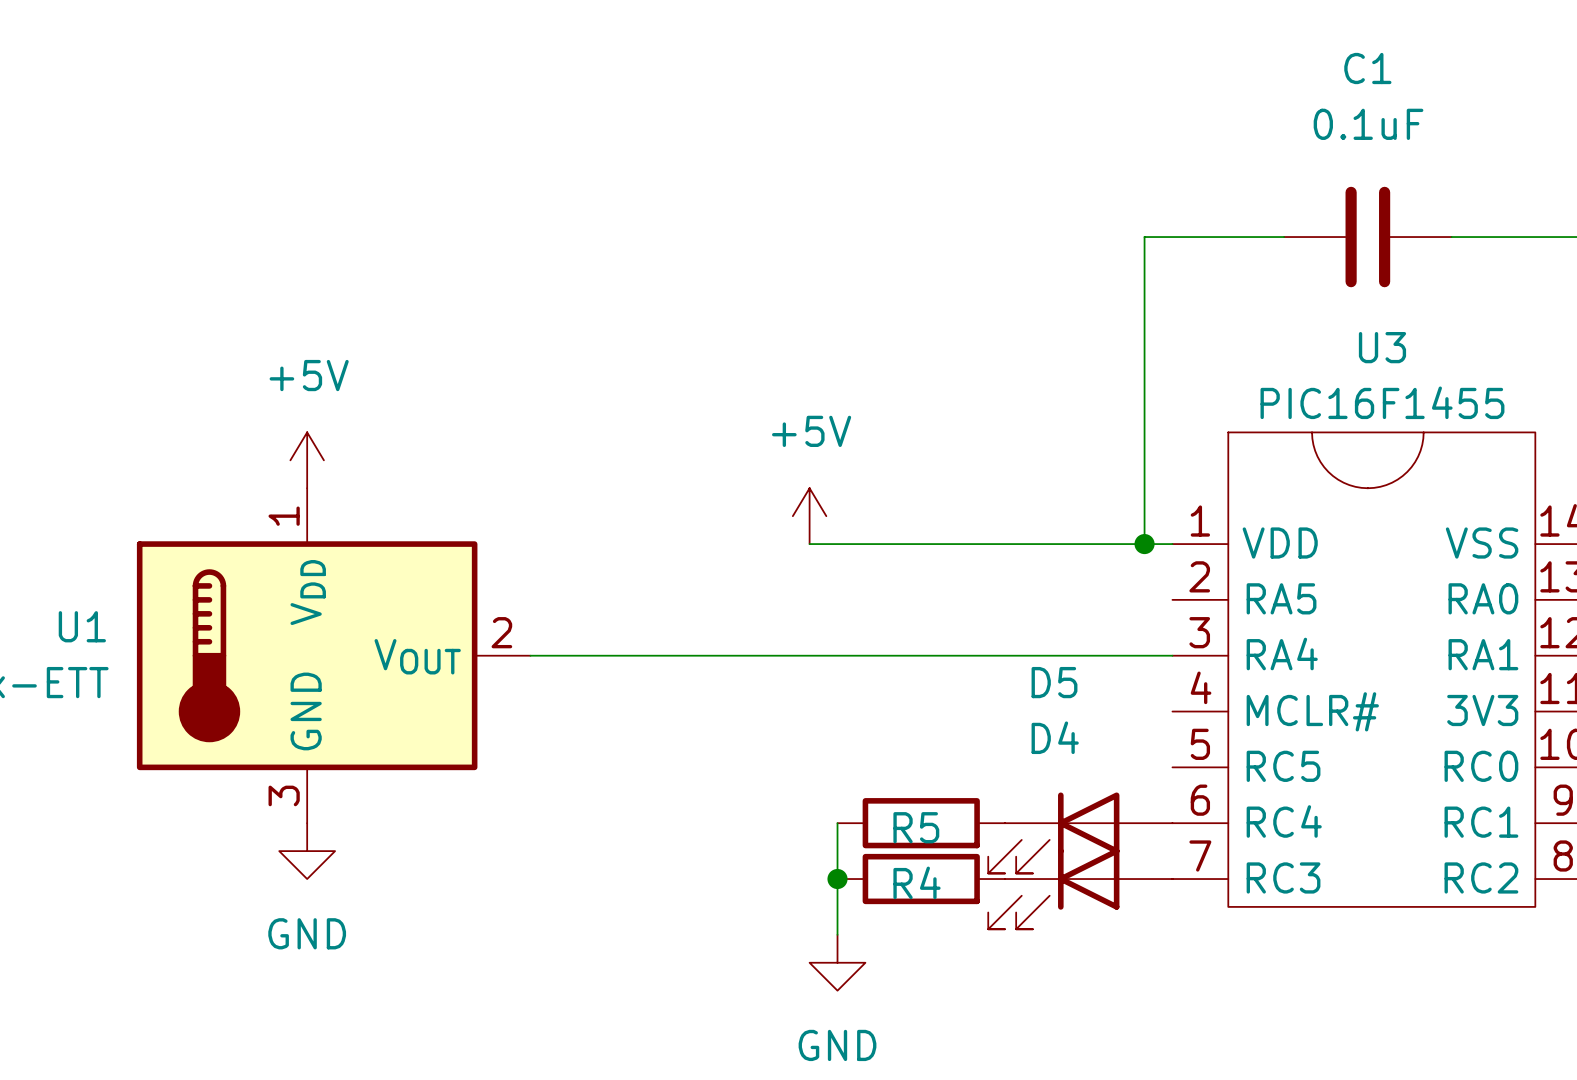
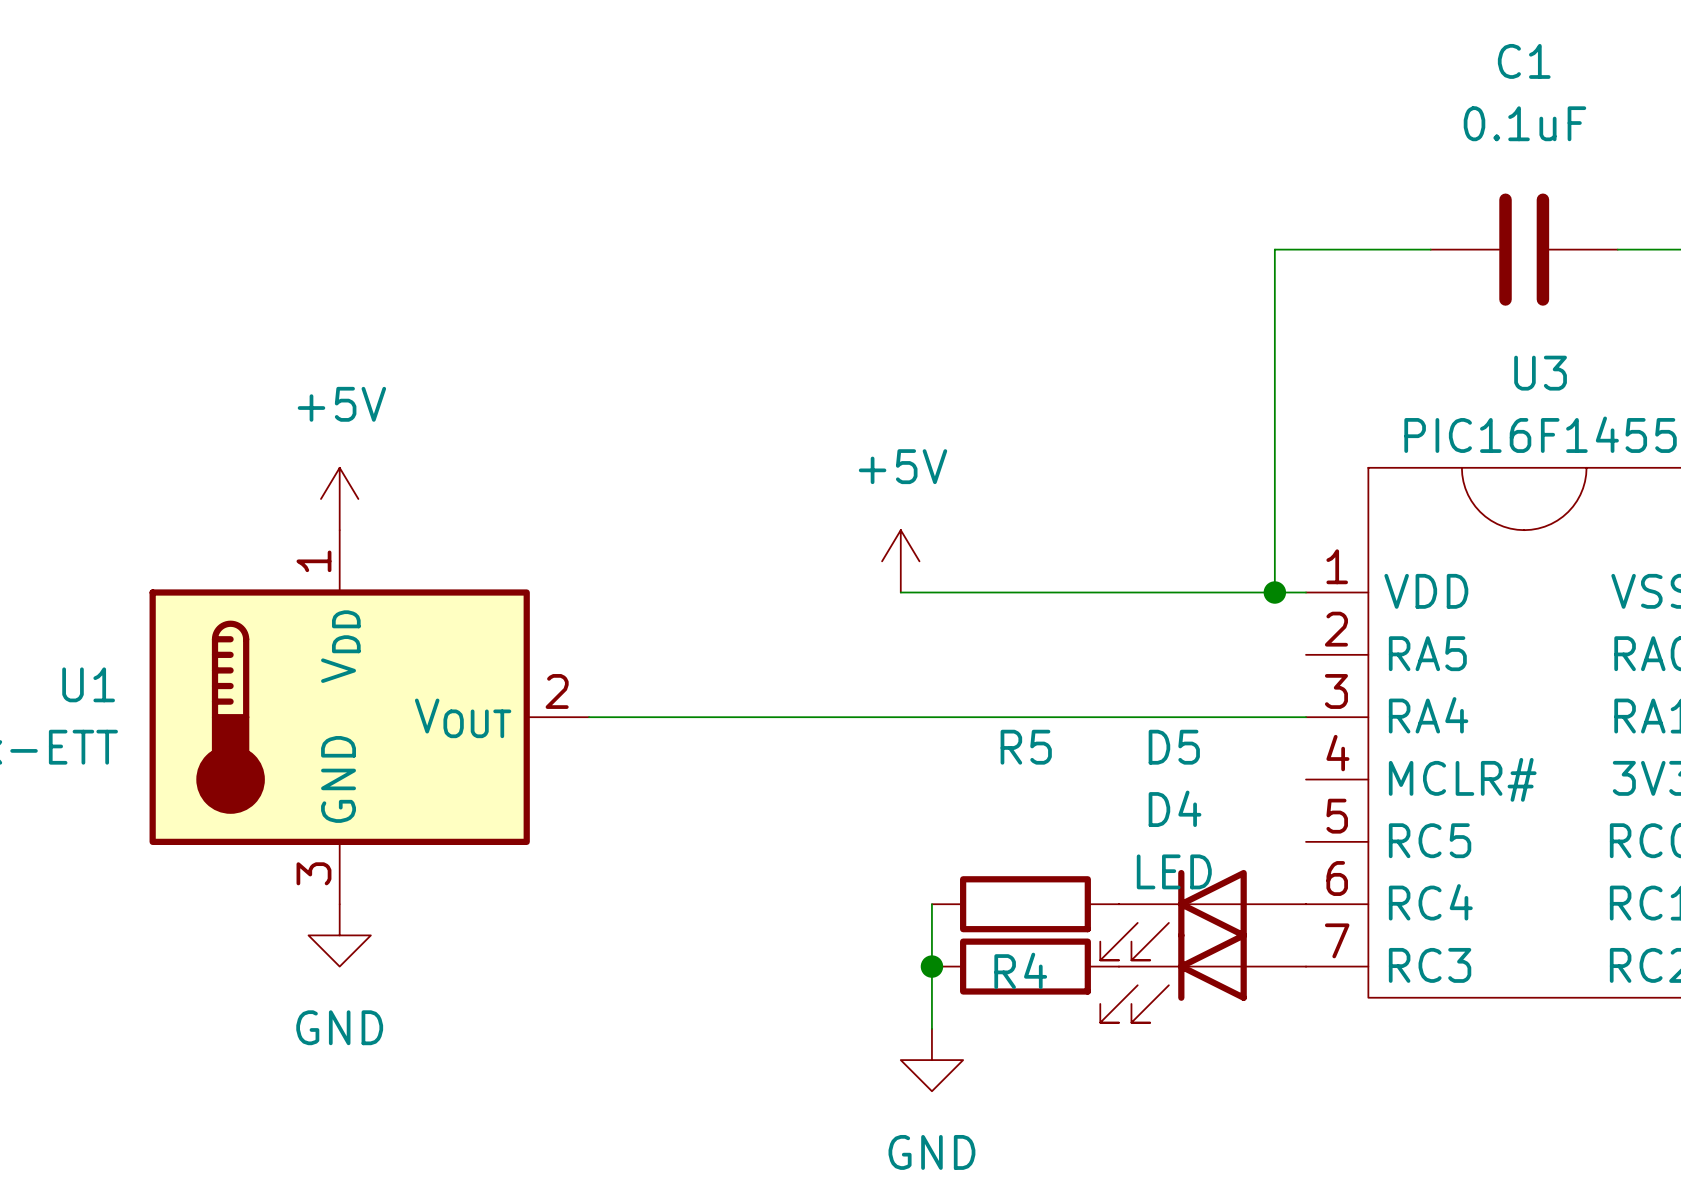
D4 value: none -> LED (1174, 871)
R5 name position: R5 (916, 827) -> R5 (1026, 747)

